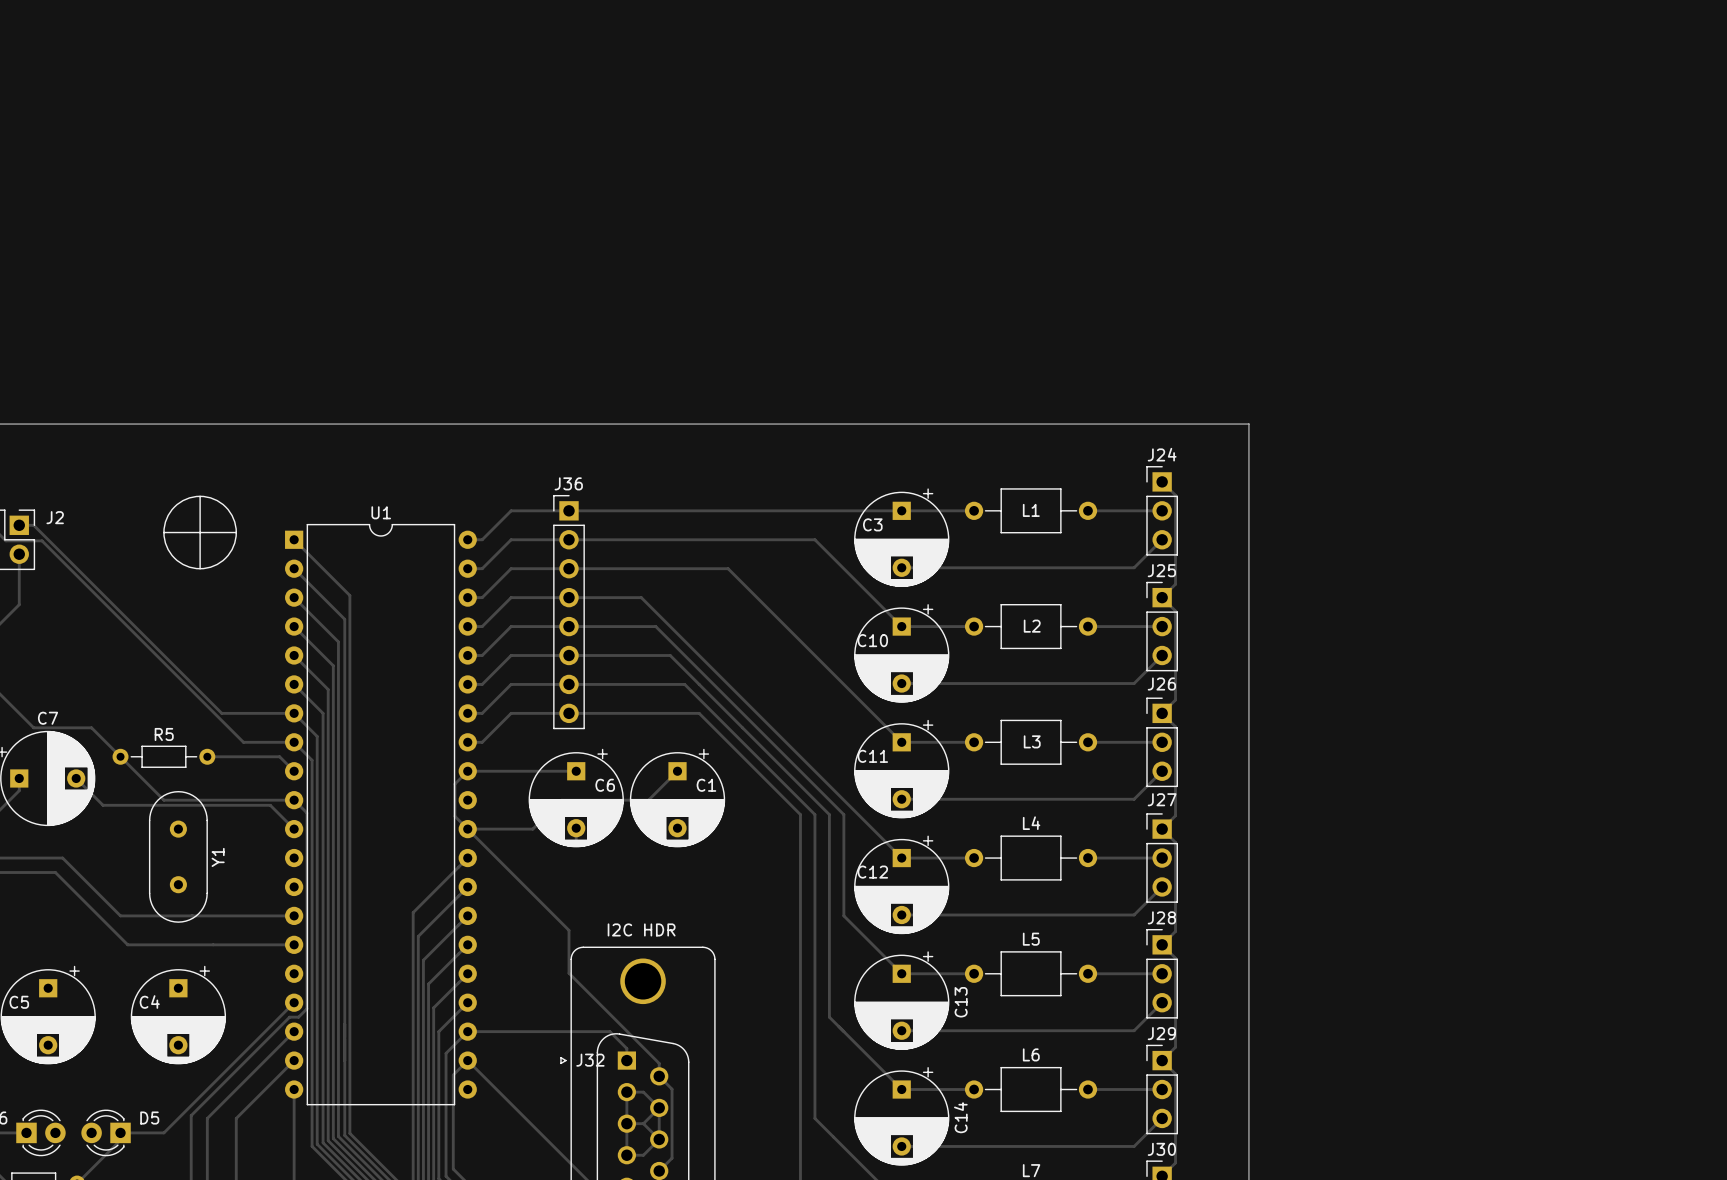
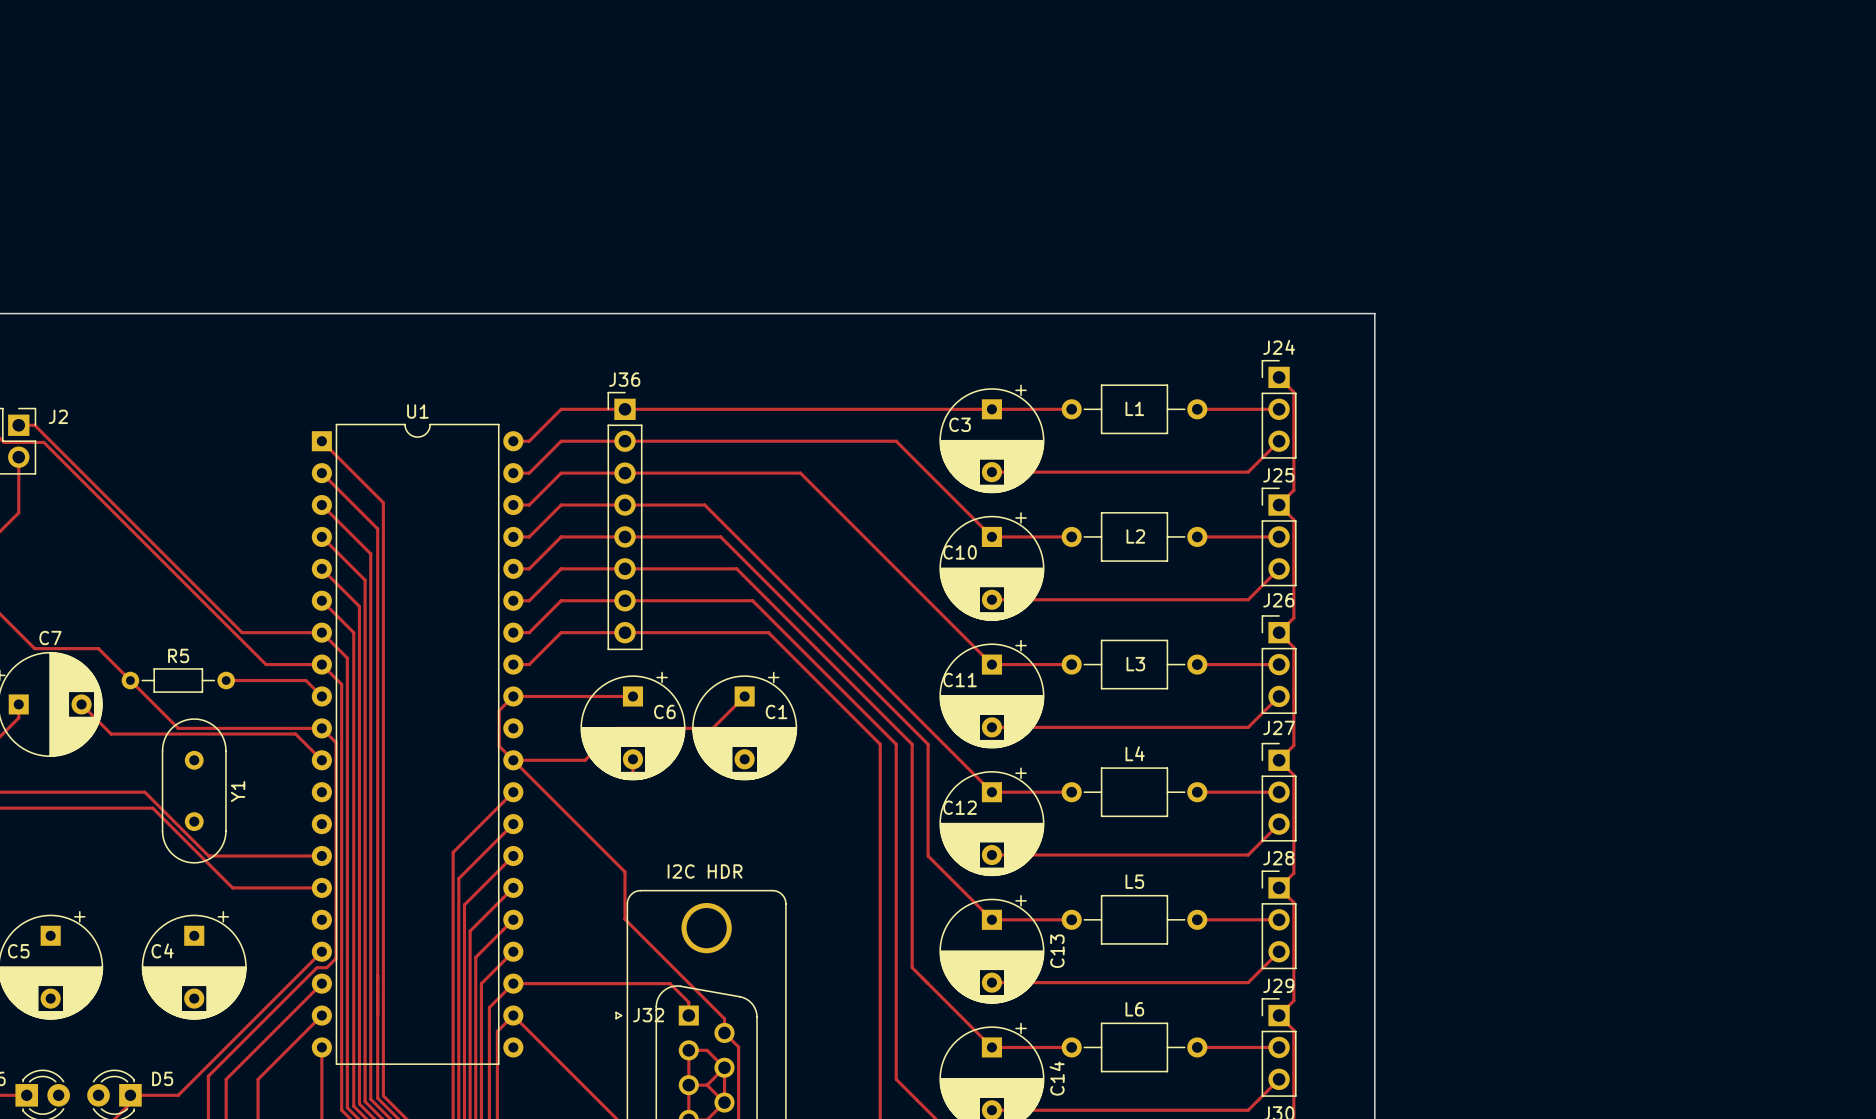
drawing: [163, 495, 237, 570] -> none
line: (200, 496) (200, 568) -> none
line: (163, 532) (236, 532) -> none
track: (62, 858) (120, 915) (191, 915) -> (66, 792) (144, 792) (208, 856)
track: (55, 872) (127, 944) (213, 944) -> (58, 808) (152, 808) (232, 887)

